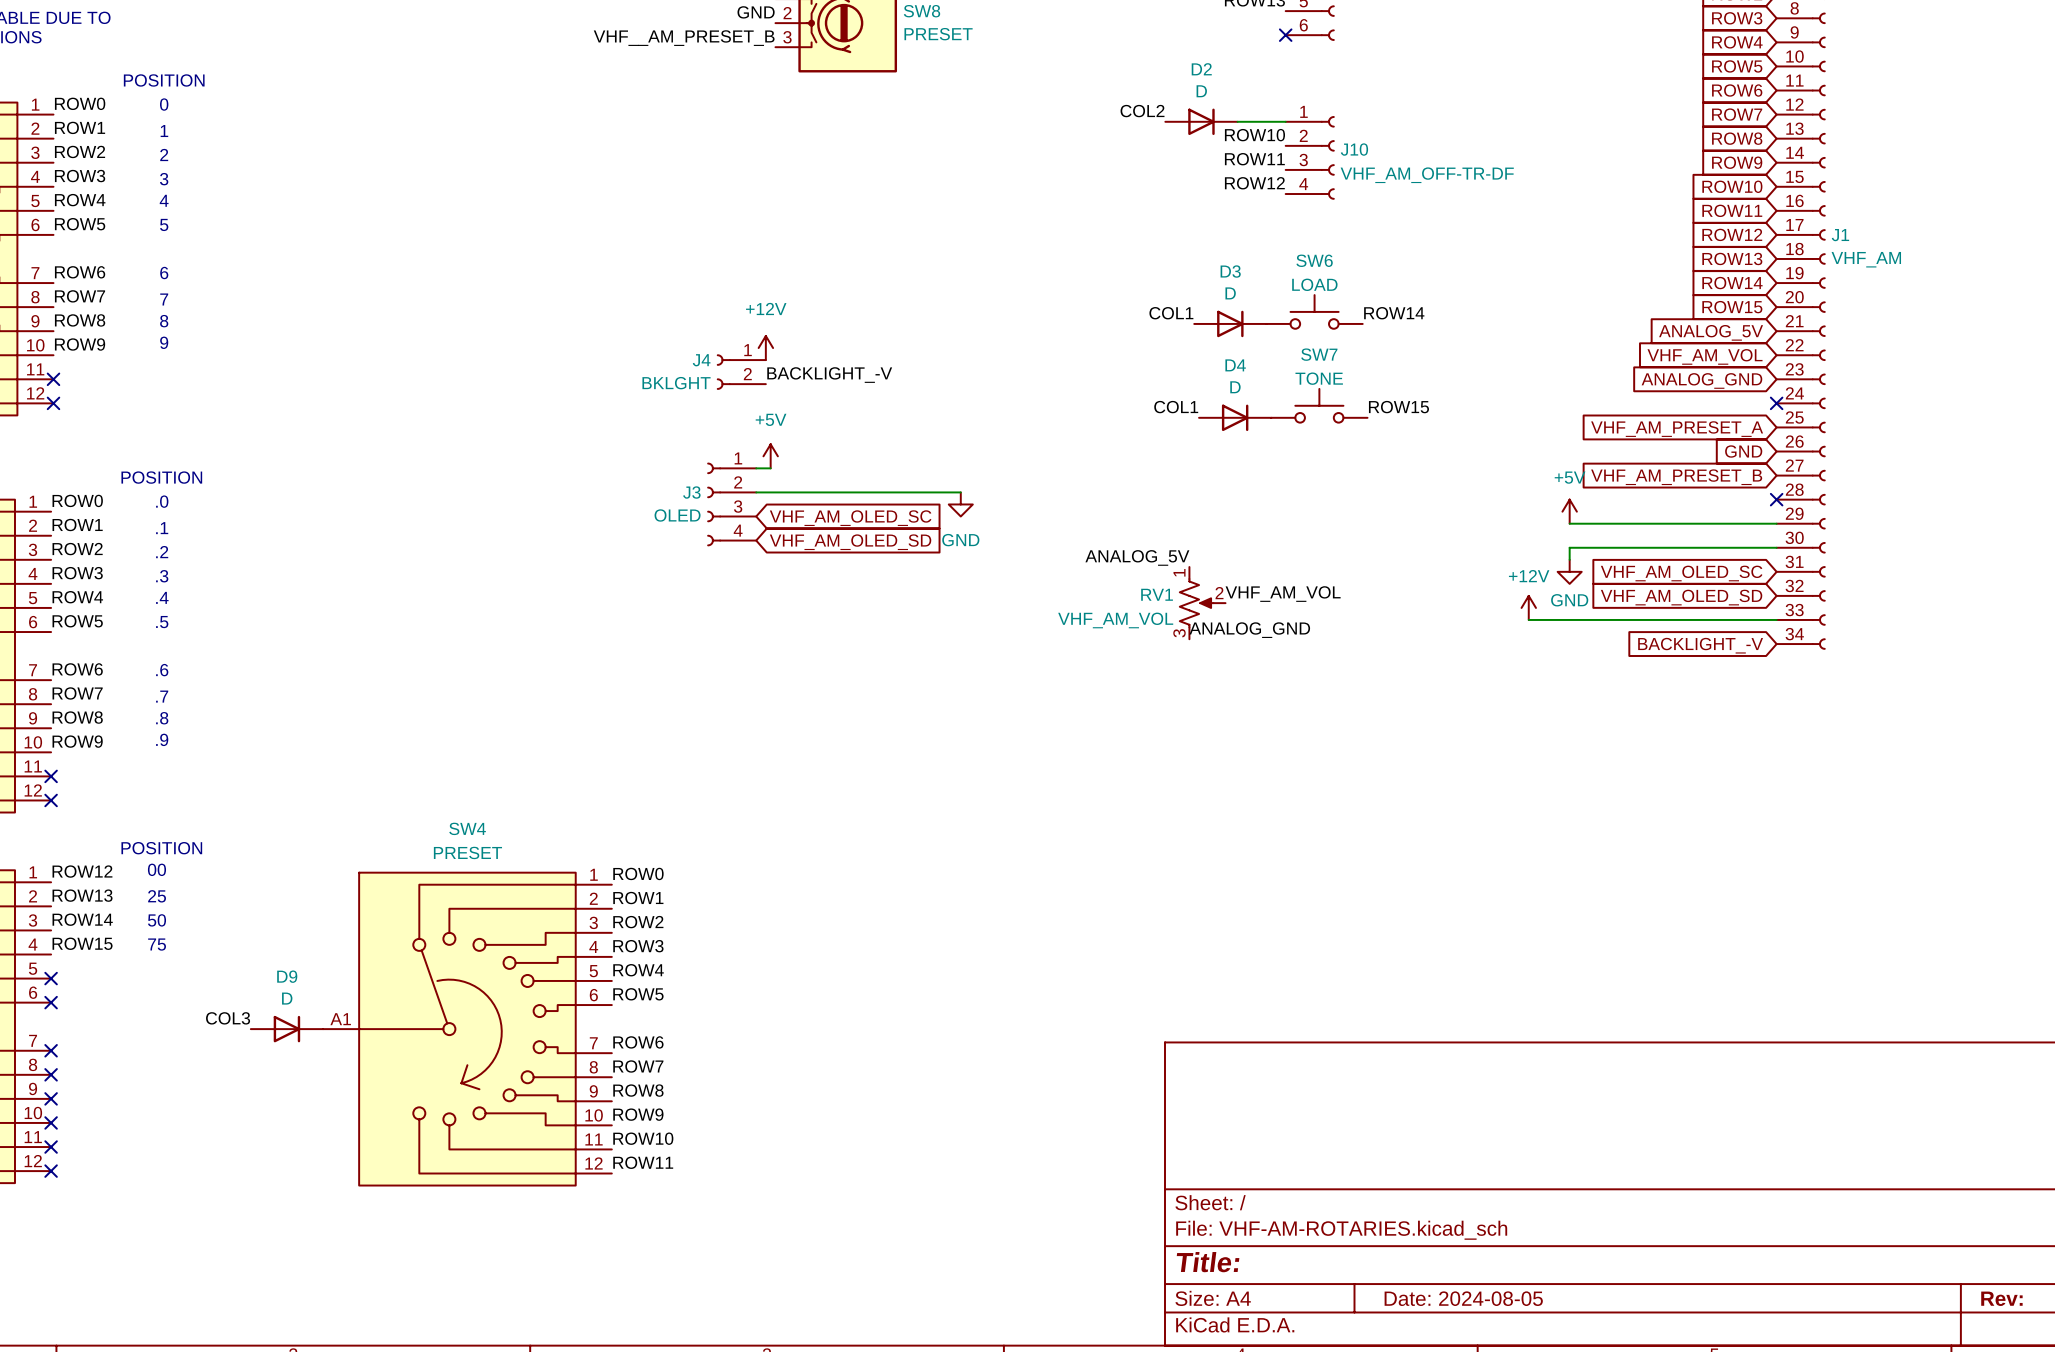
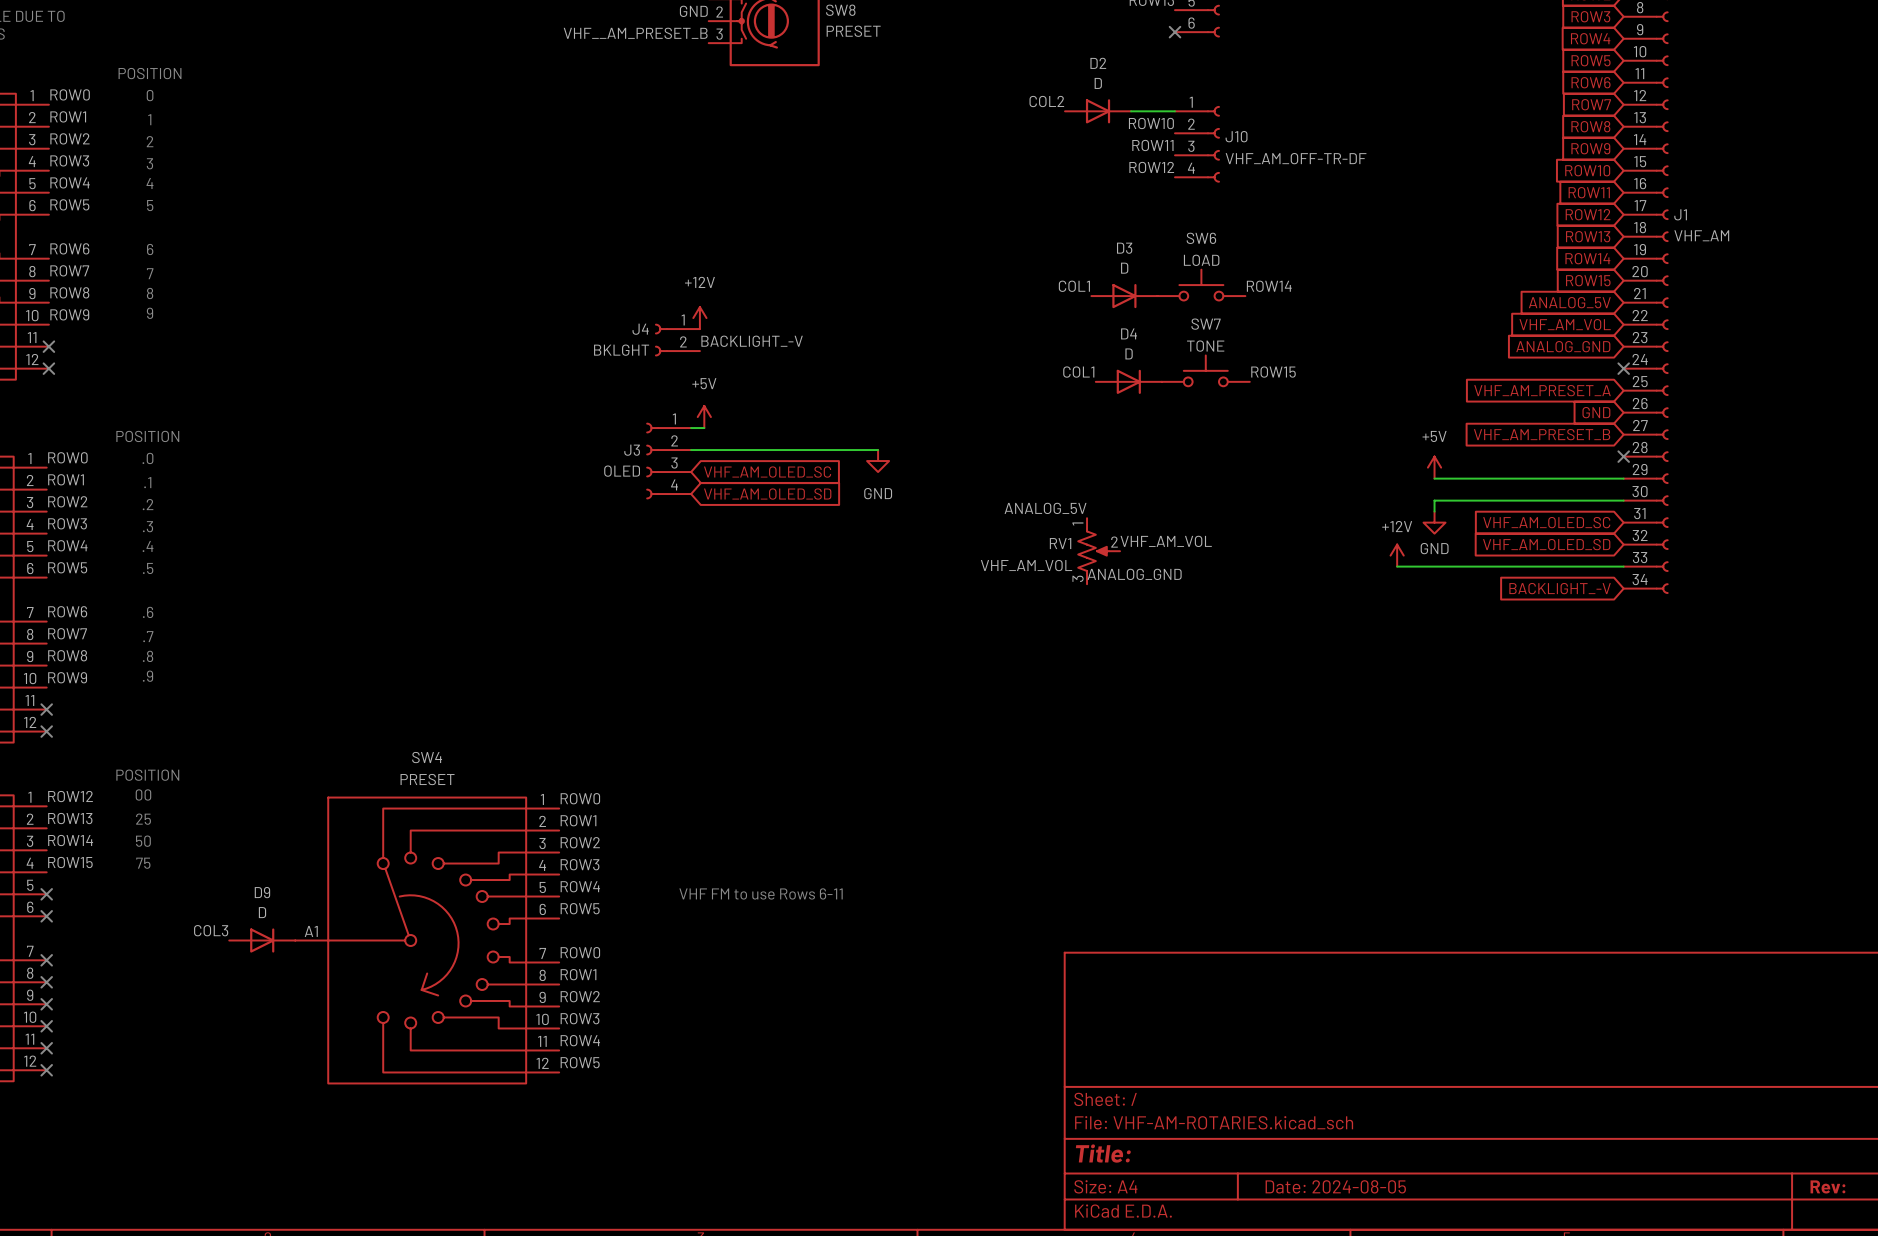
text: none -> VHF FM to use Rows 6-11 (761, 893)
label: ROW6 (638, 1042) -> ROW0 (580, 952)
label: ROW7 (638, 1066) -> ROW1 (578, 974)
label: ROW8 (638, 1090) -> ROW2 (580, 996)
label: ROW9 (638, 1114) -> ROW3 (580, 1018)
label: ROW10 (643, 1138) -> ROW4 (580, 1040)
label: ROW11 (643, 1162) -> ROW5 (580, 1062)

